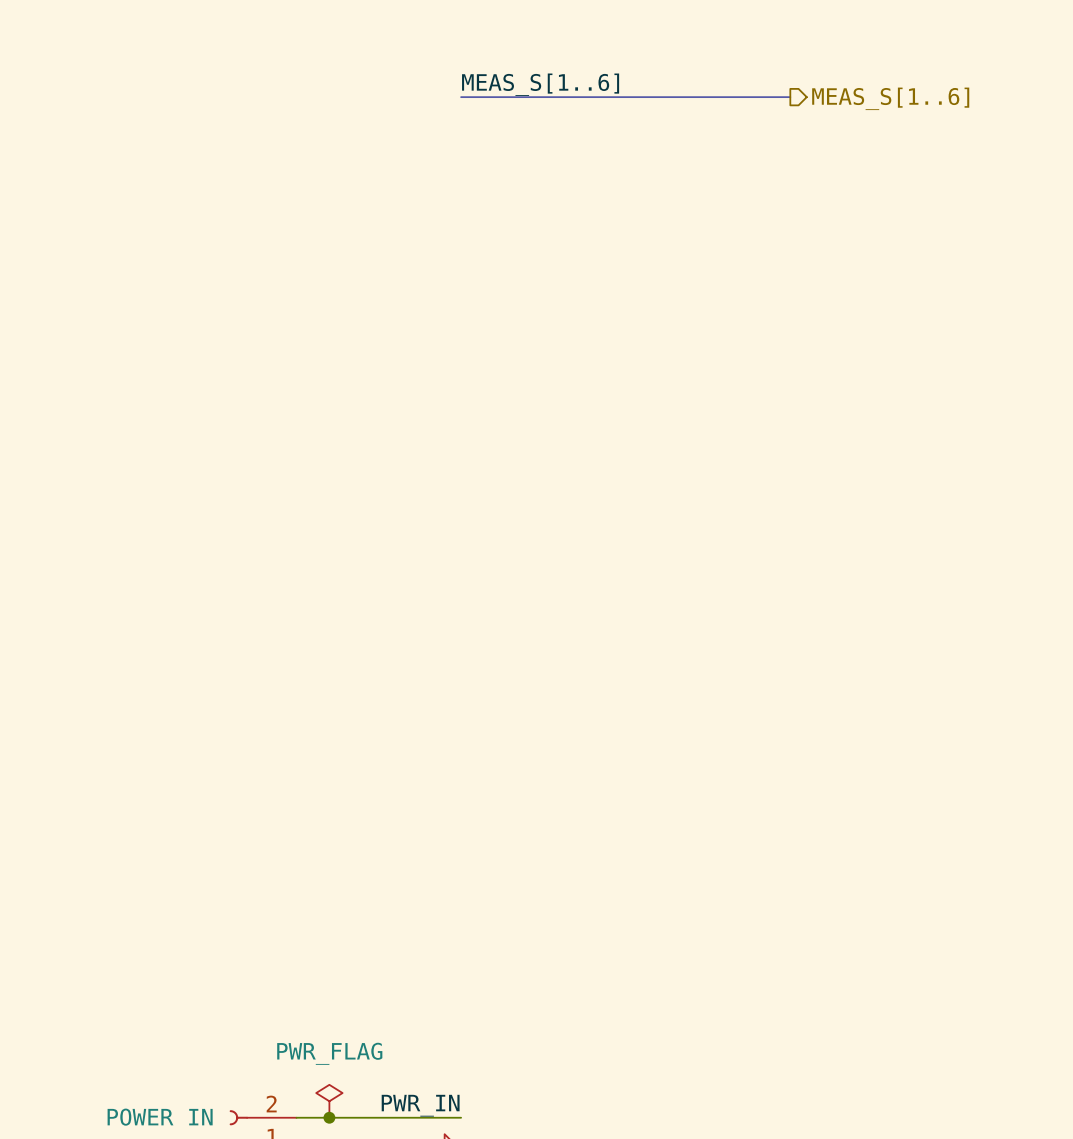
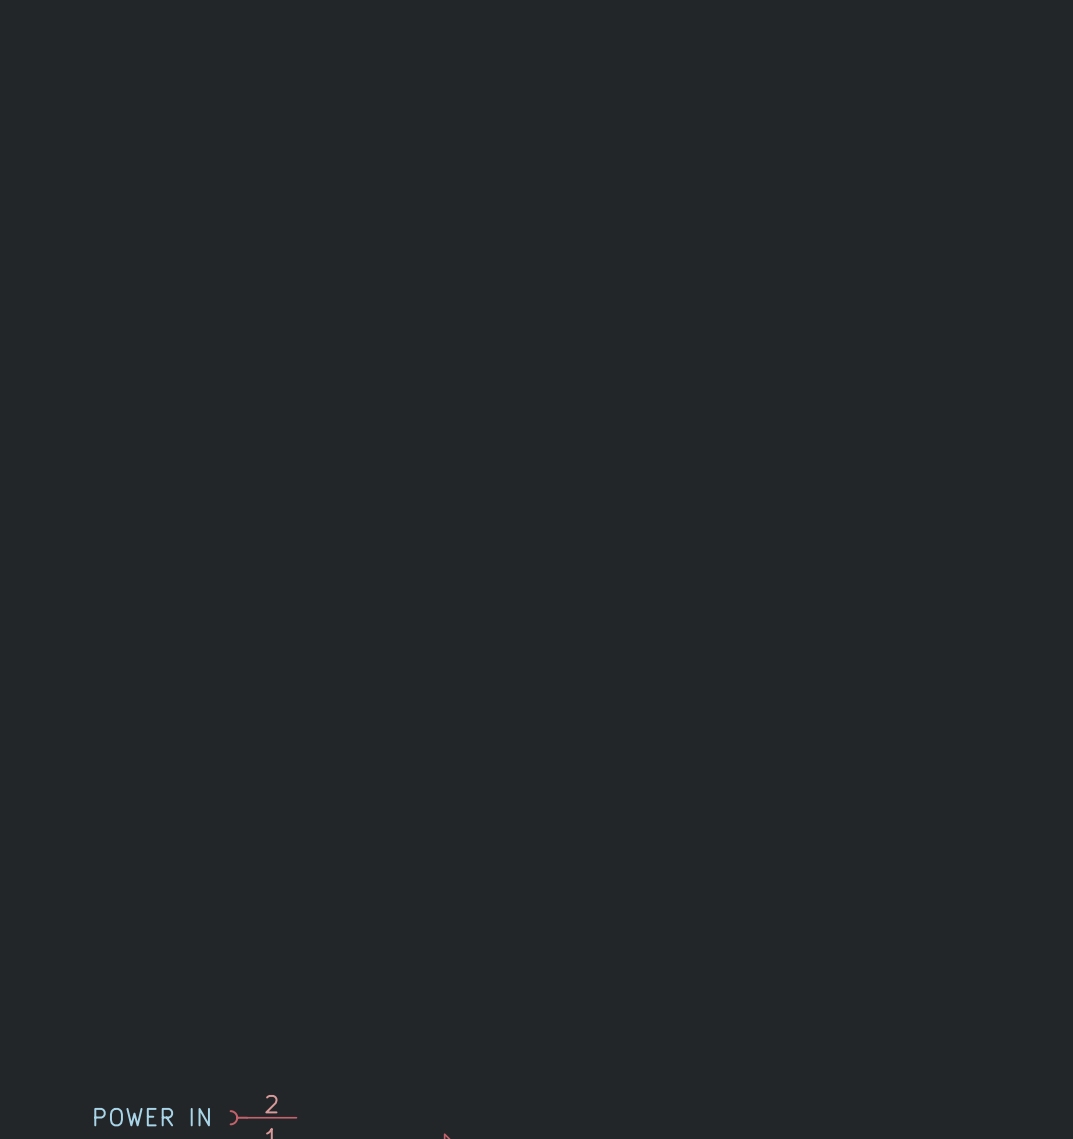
label: MEAS_S[1..6] (540, 84) -> none
bus: (461, 97) (790, 97) -> none
hierarchical label: MEAS_S[1..6] (890, 98) -> none
power symbol: PWR_FLAG (329, 1101) -> none
label: PWR_IN (420, 1105) -> none
wire: (296, 1117) (461, 1117) -> none
junction: (329, 1117) -> none

